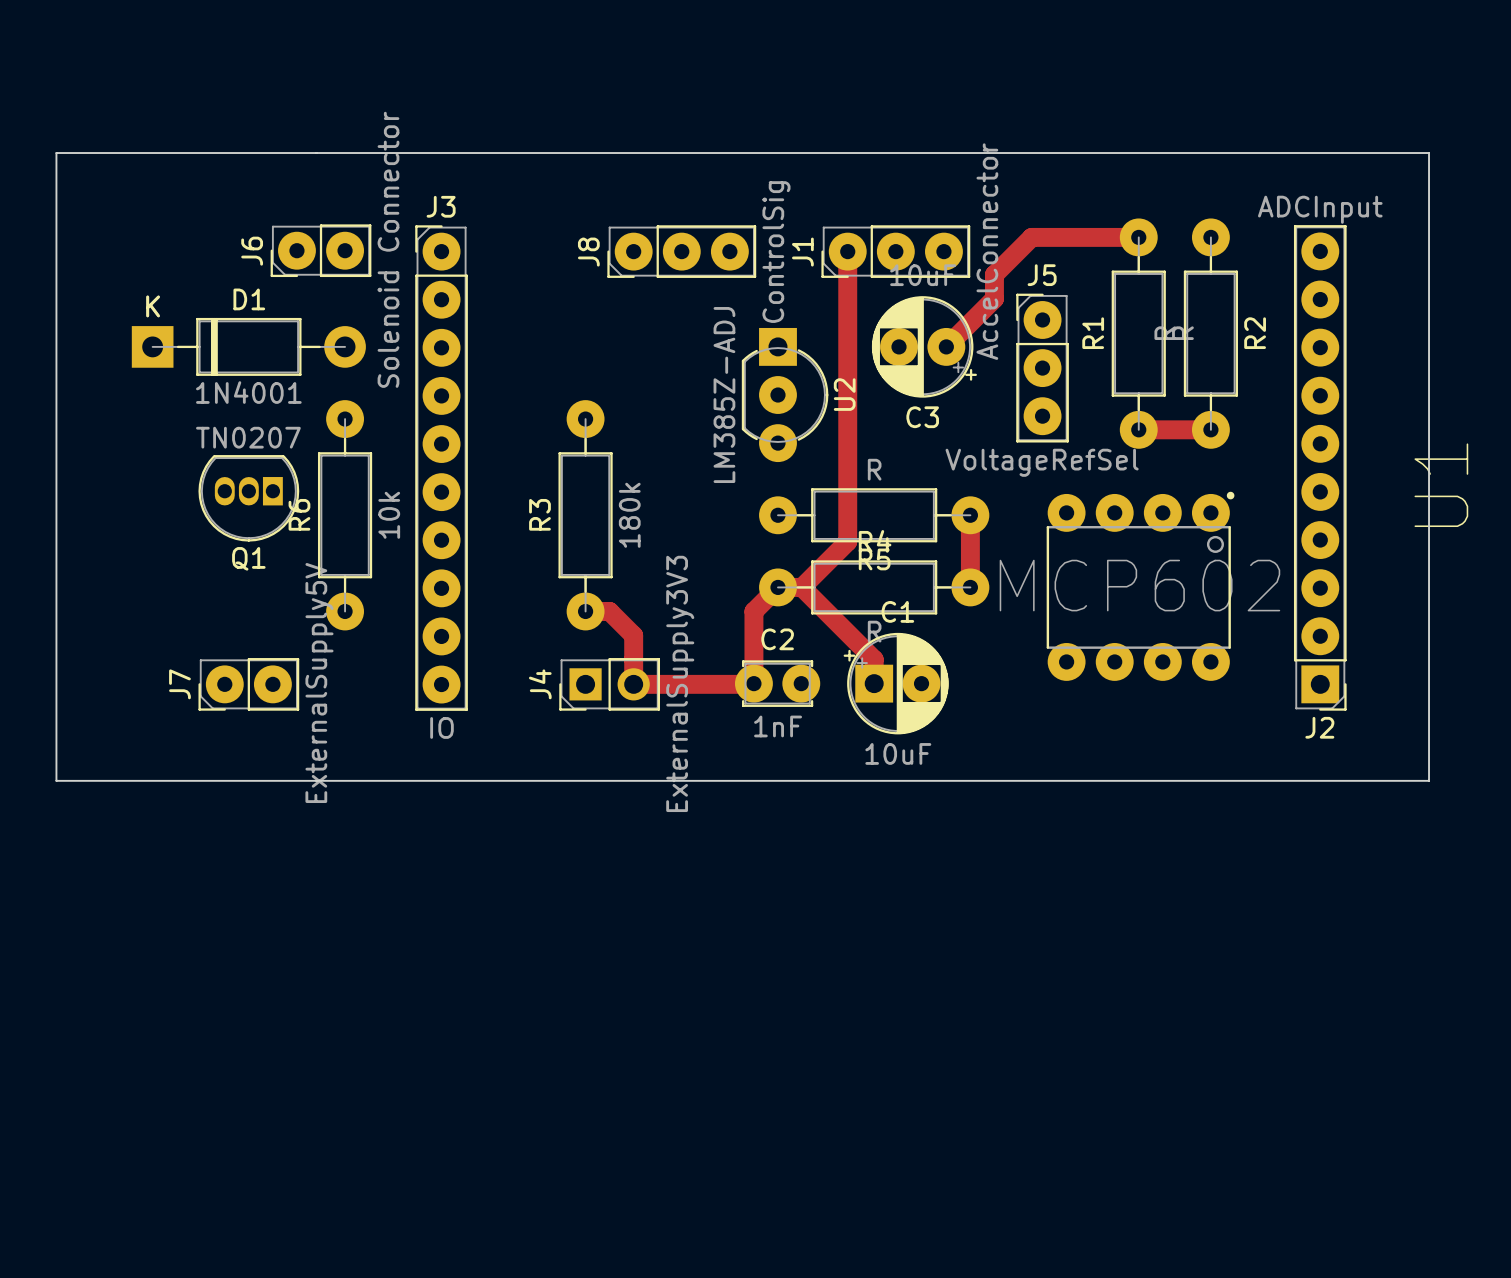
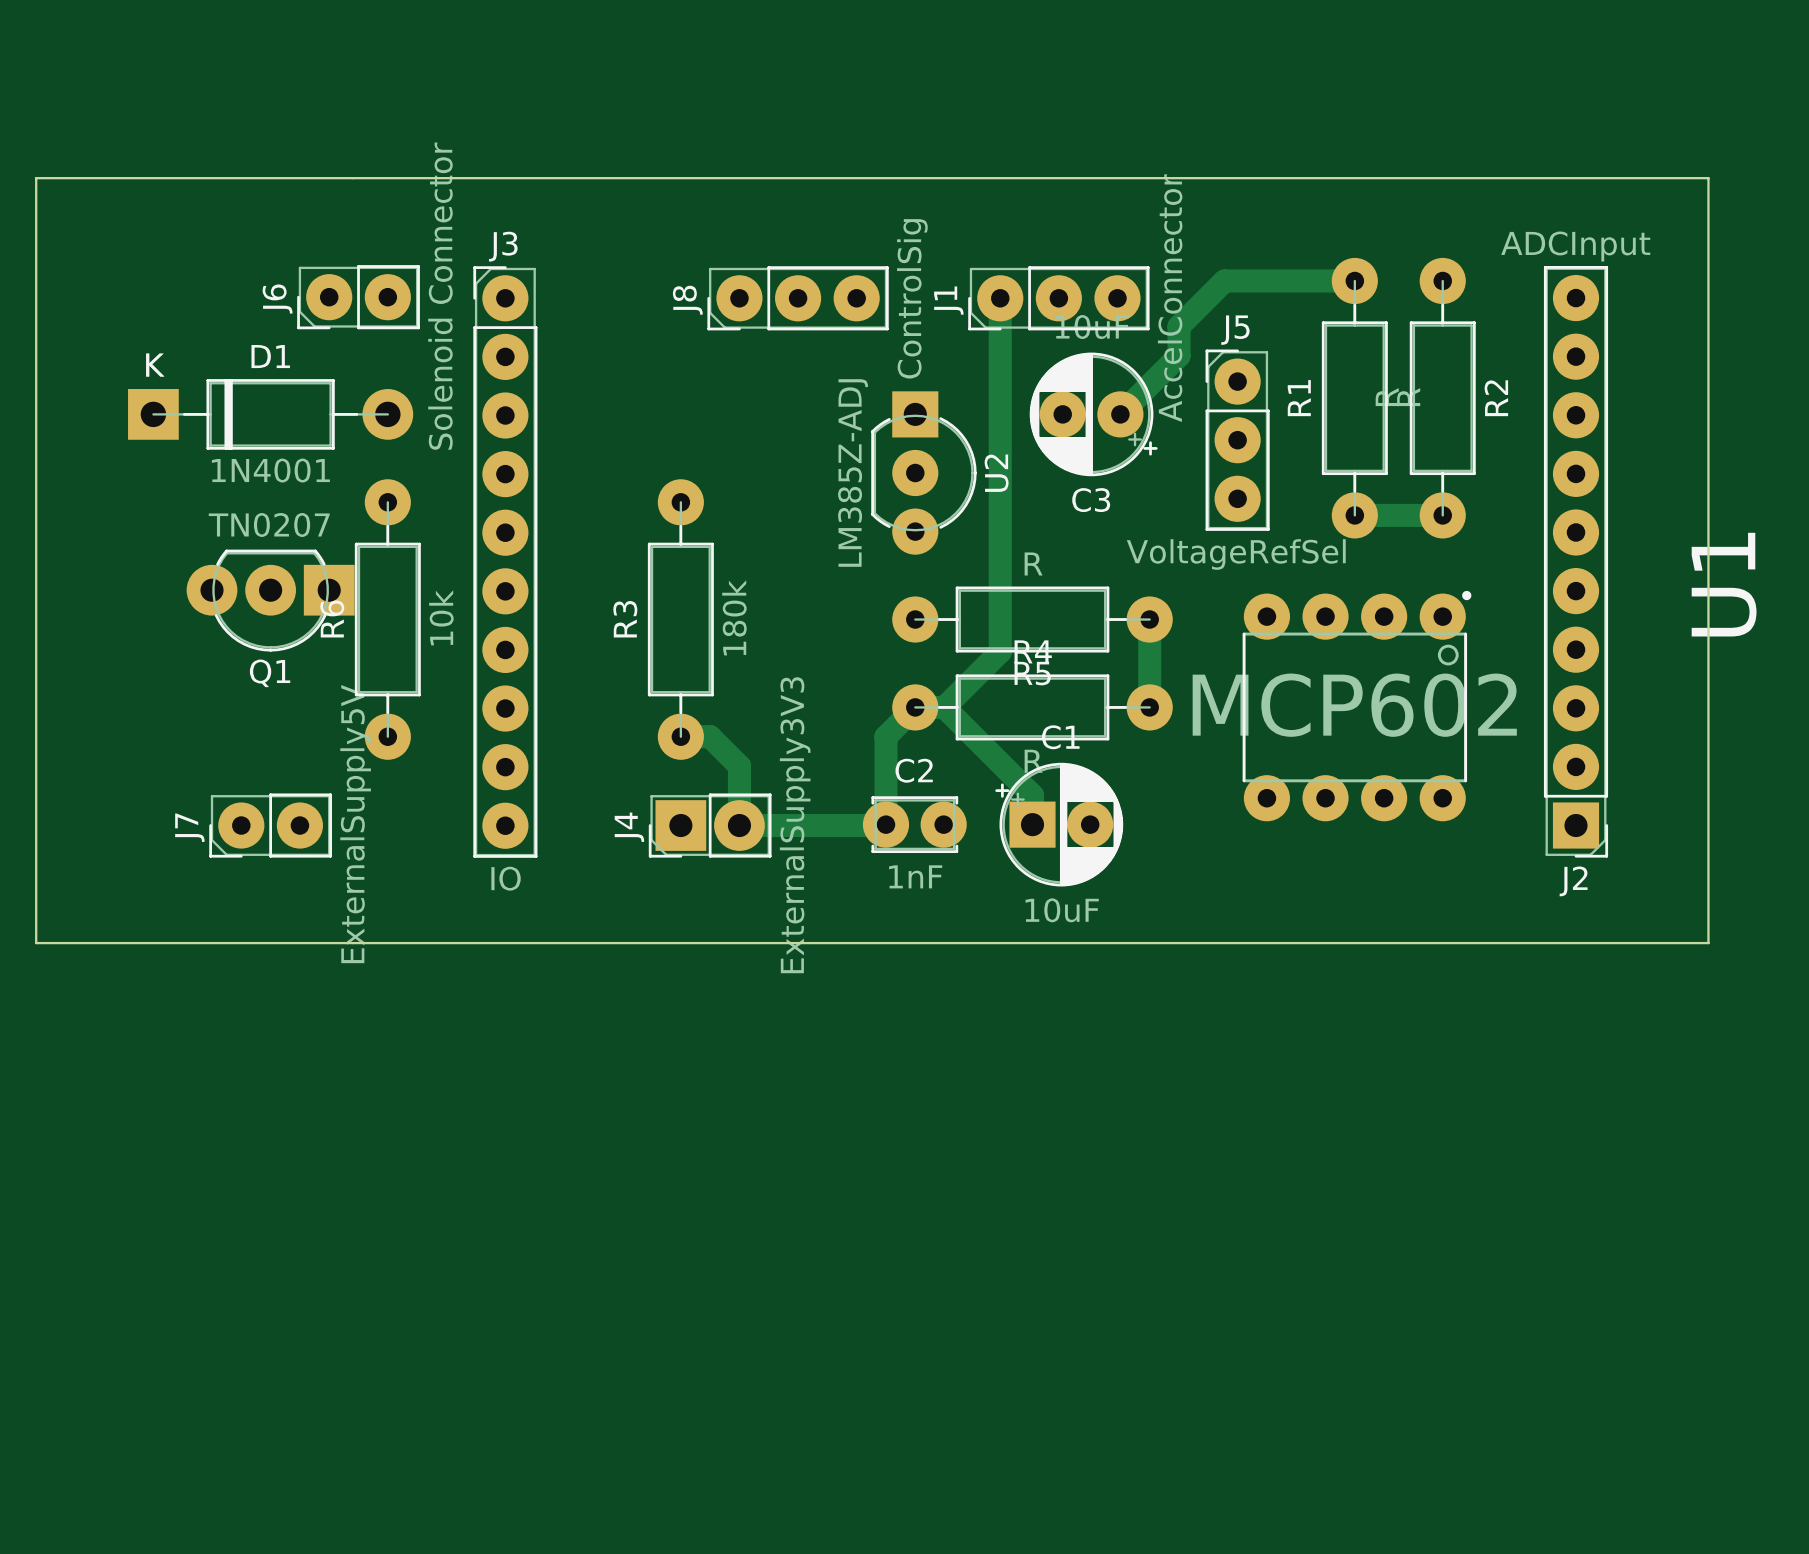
Q1 footprint: [198, 455, 300, 542] -> [186, 549, 355, 652]
J4 footprint: [559, 658, 661, 711] -> [648, 793, 772, 858]

